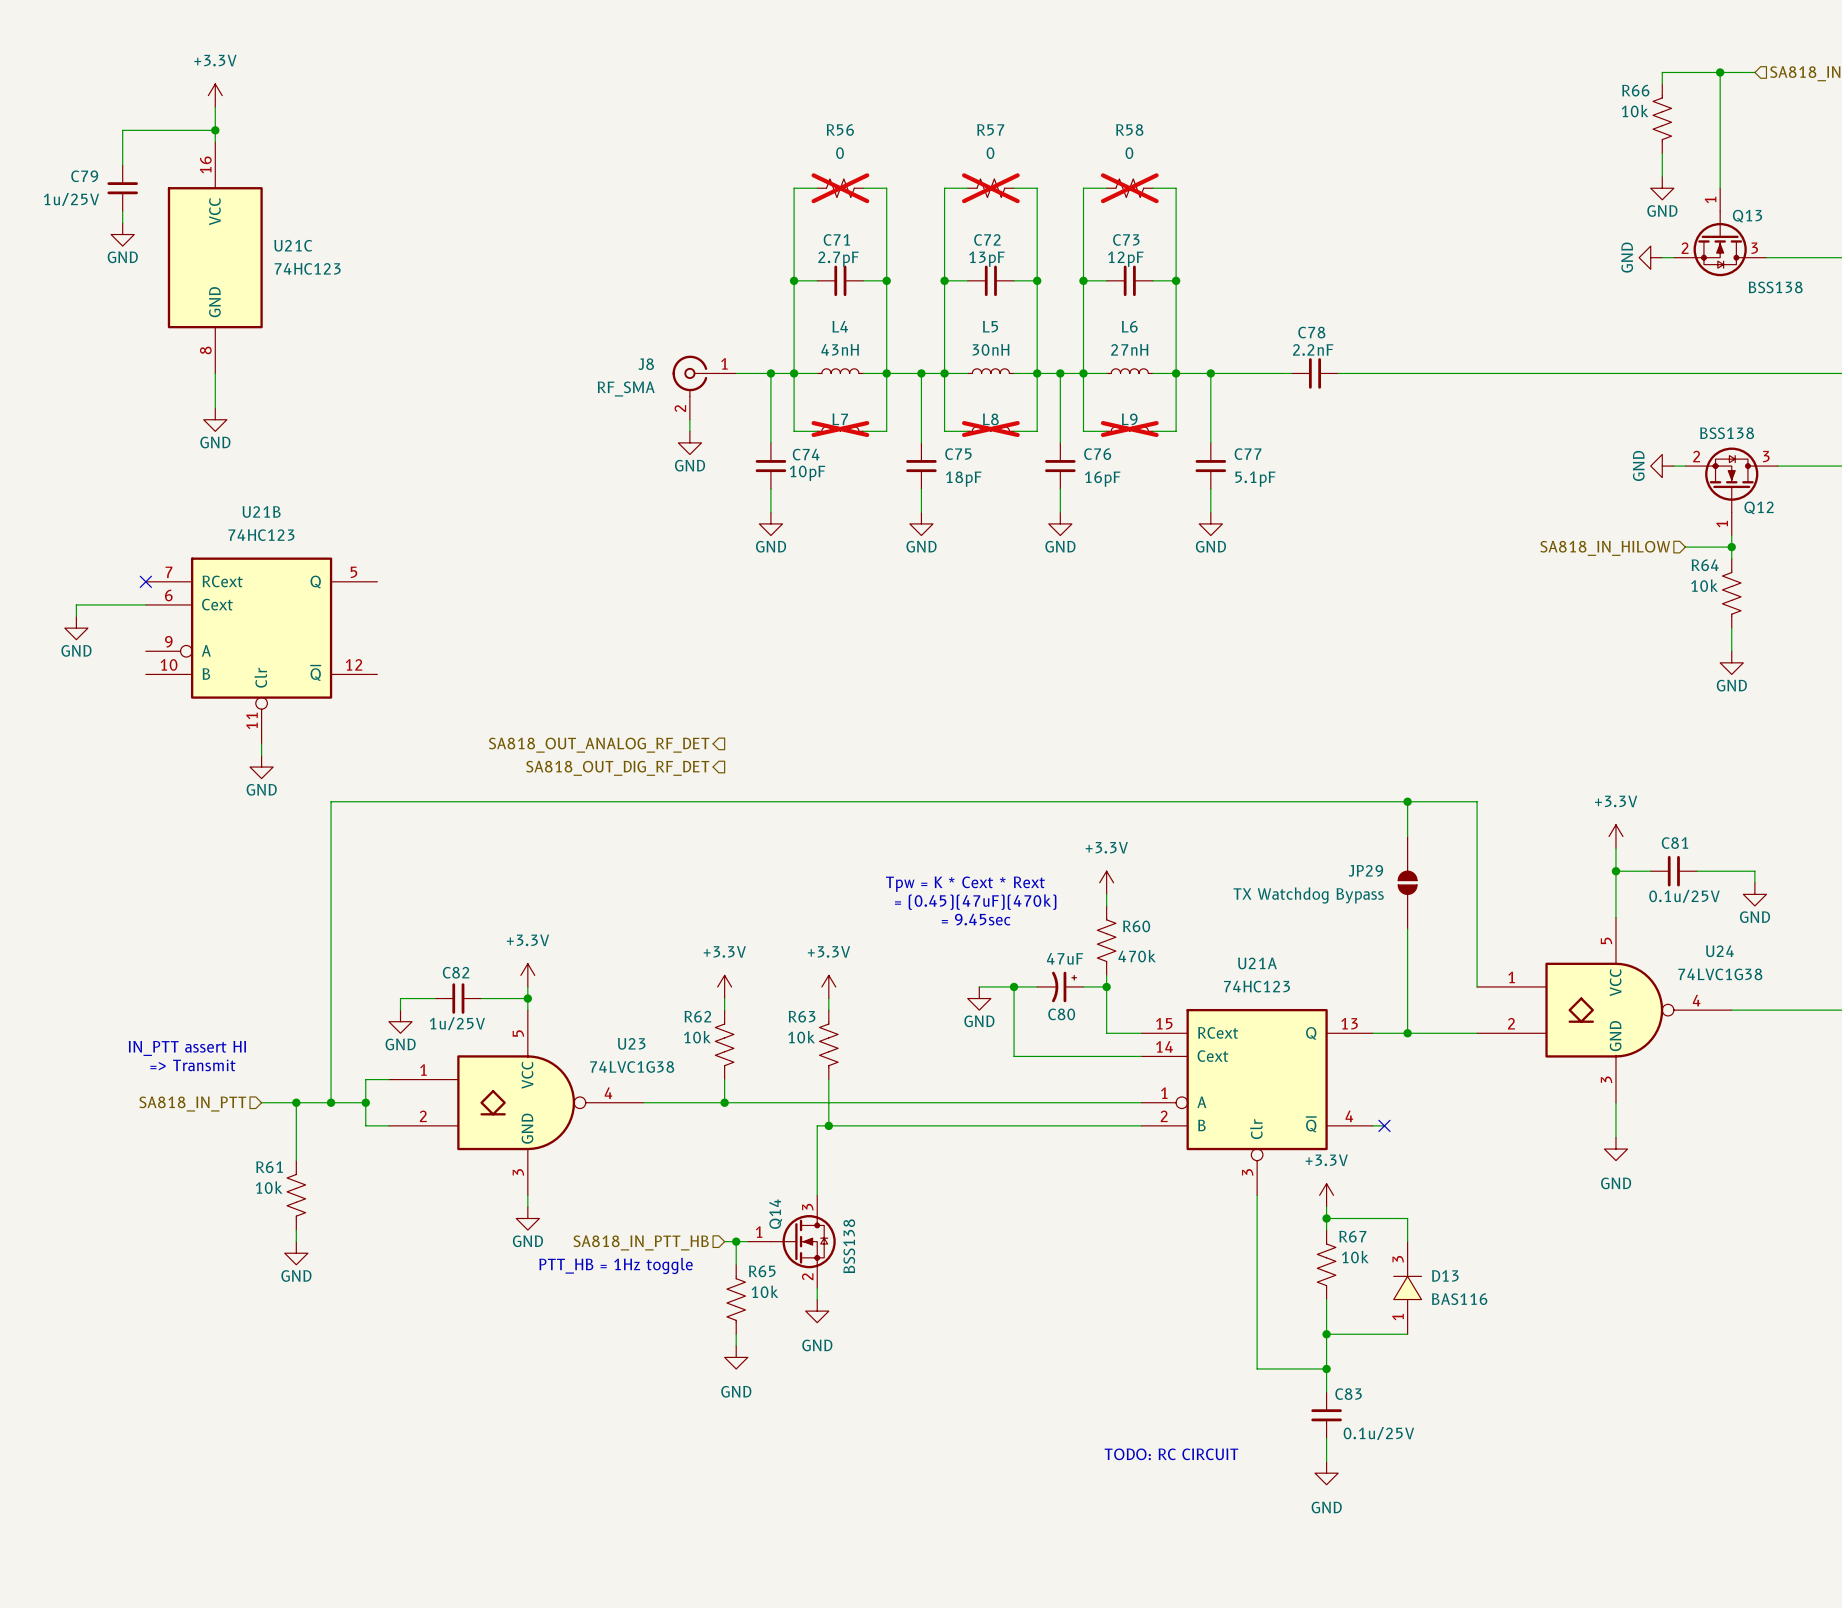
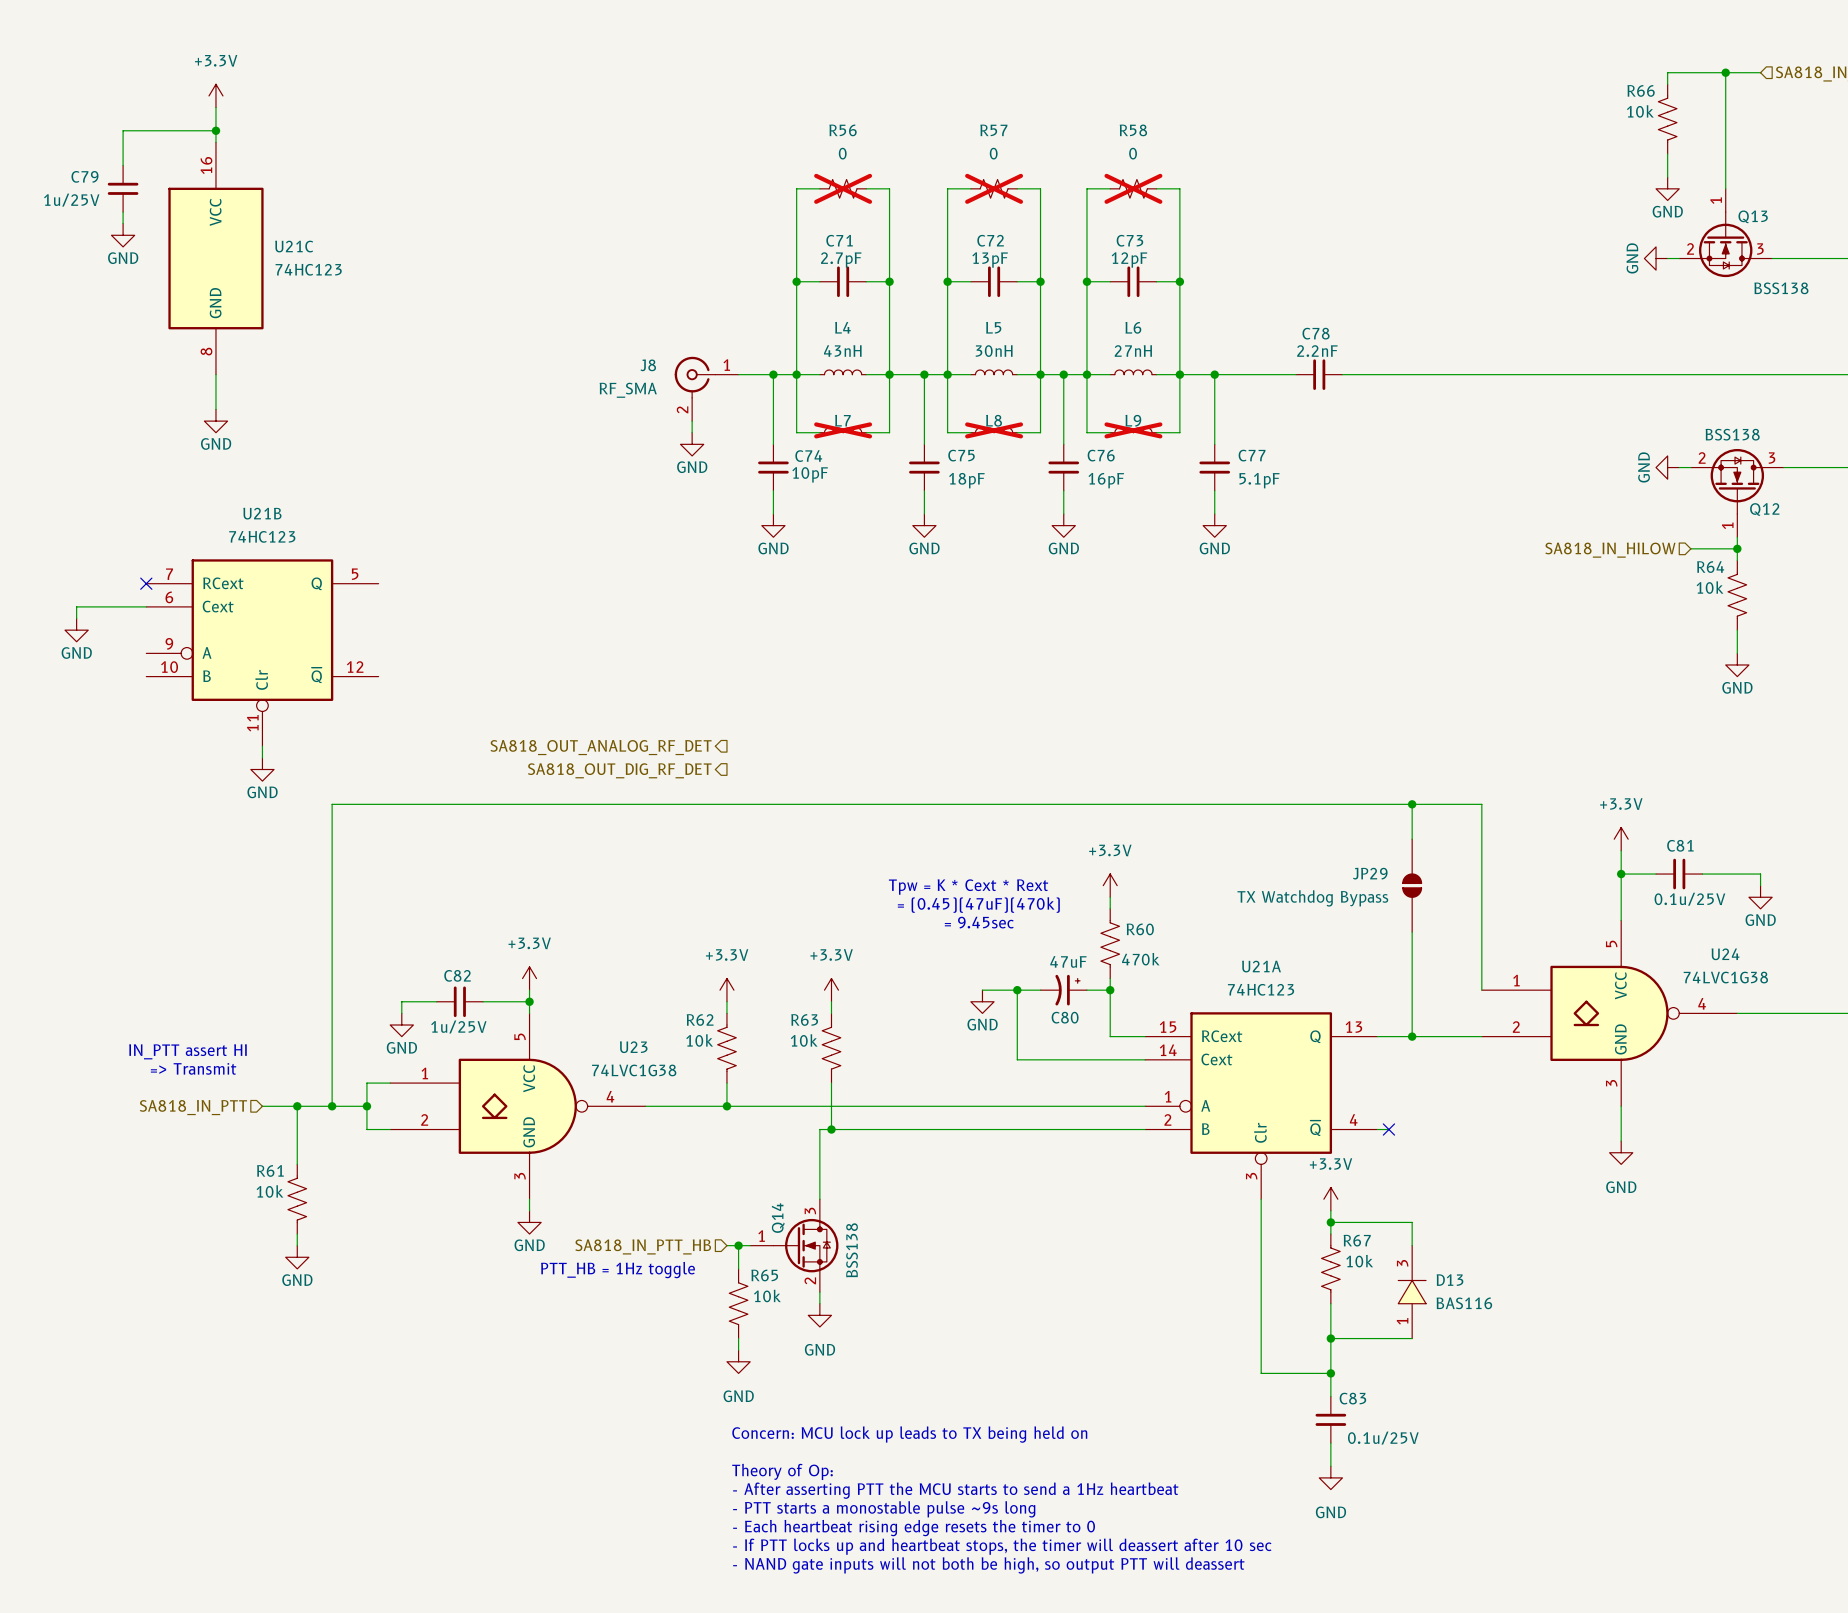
text: none -> Concern: MCU lock up leads to TX being held on (909, 1434)
text: TODO: RC CIRCUIT (1171, 1454) -> none
text: none -> Theory of Op: (782, 1471)
text: none -> - After asserting PTT the MCU starts to send a 1Hz heartbeat (955, 1490)
text: none -> - PTT starts a monostable pulse ~9s long (884, 1509)
text: none -> - Each heartbeat rising edge resets the timer to 0 (914, 1528)
text: none -> - If PTT locks up and heartbeat stops, the timer will deassert after 10 sec (1002, 1546)
text: none -> - NAND gate inputs will not both be high, so output PTT will deassert (988, 1565)

